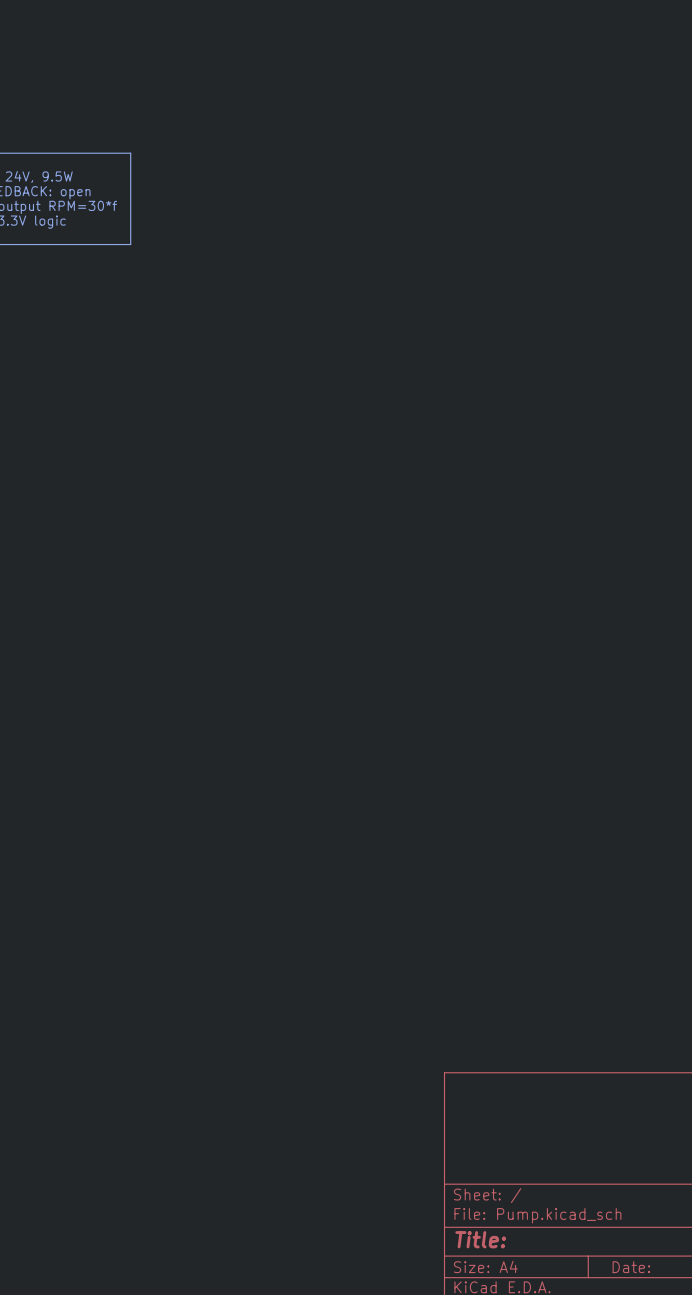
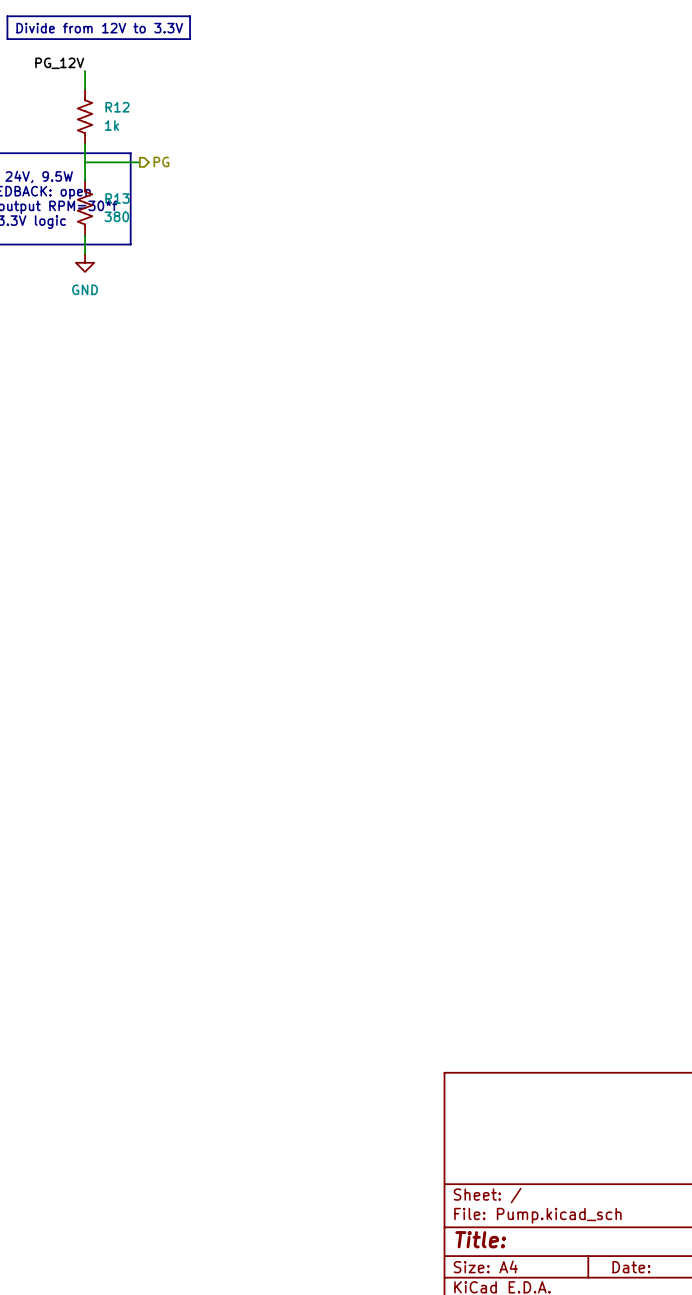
line: none -> (7, 16) (190, 16) (190, 39) (7, 39) (7, 16)
text: none -> Divide from 12V to 3.3V (99, 28)
label: none -> PG_12V (59, 63)
wire: none -> (85, 71) (85, 89)
R12: none -> 1k (85, 116)
wire: none -> (85, 144) (85, 180)
wire: none -> (85, 162) (139, 162)
hierarchical label: none -> PG (161, 162)
R13: none -> 380 (85, 208)
wire: none -> (85, 235) (85, 253)
power symbol: none -> GND (85, 262)

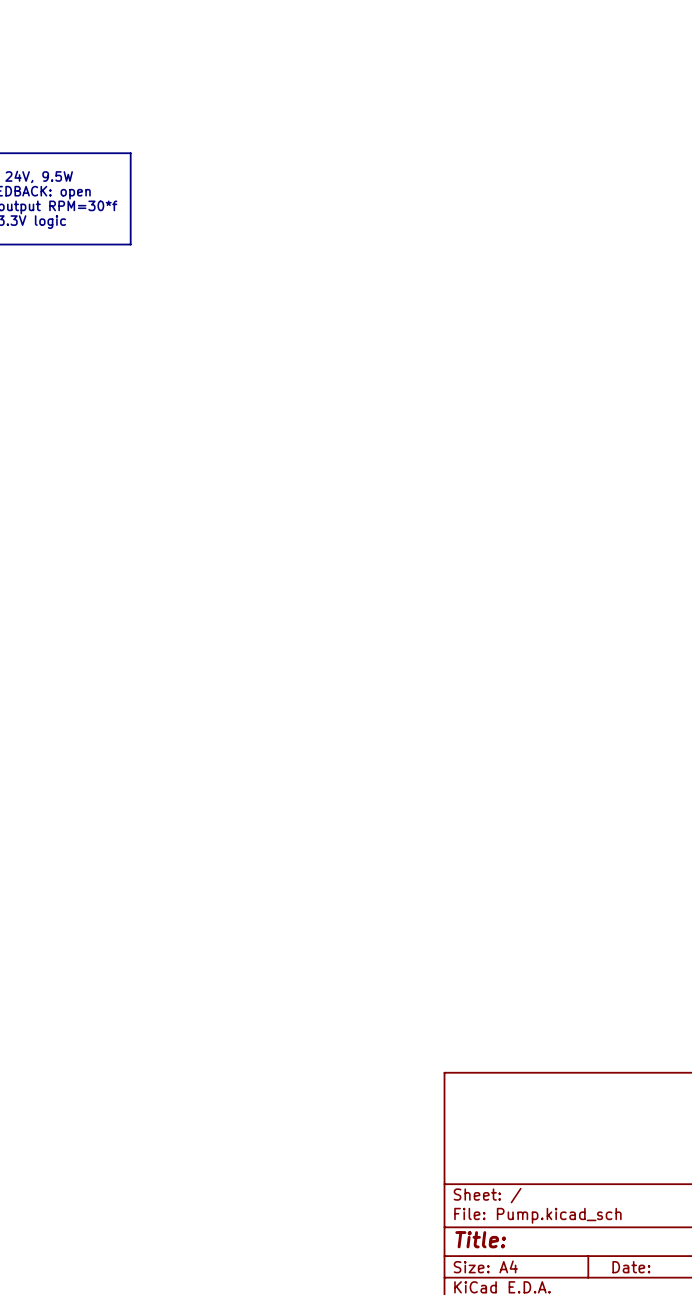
line: (7, 16) (190, 16) (190, 39) (7, 39) (7, 16) -> none
text: Divide from 12V to 3.3V (99, 28) -> none
label: PG_12V (59, 63) -> none
wire: (85, 71) (85, 89) -> none
R12: 1k (85, 116) -> none
wire: (85, 144) (85, 180) -> none
wire: (85, 162) (139, 162) -> none
hierarchical label: PG (161, 162) -> none
R13: 380 (85, 208) -> none
wire: (85, 235) (85, 253) -> none
power symbol: GND (85, 262) -> none

